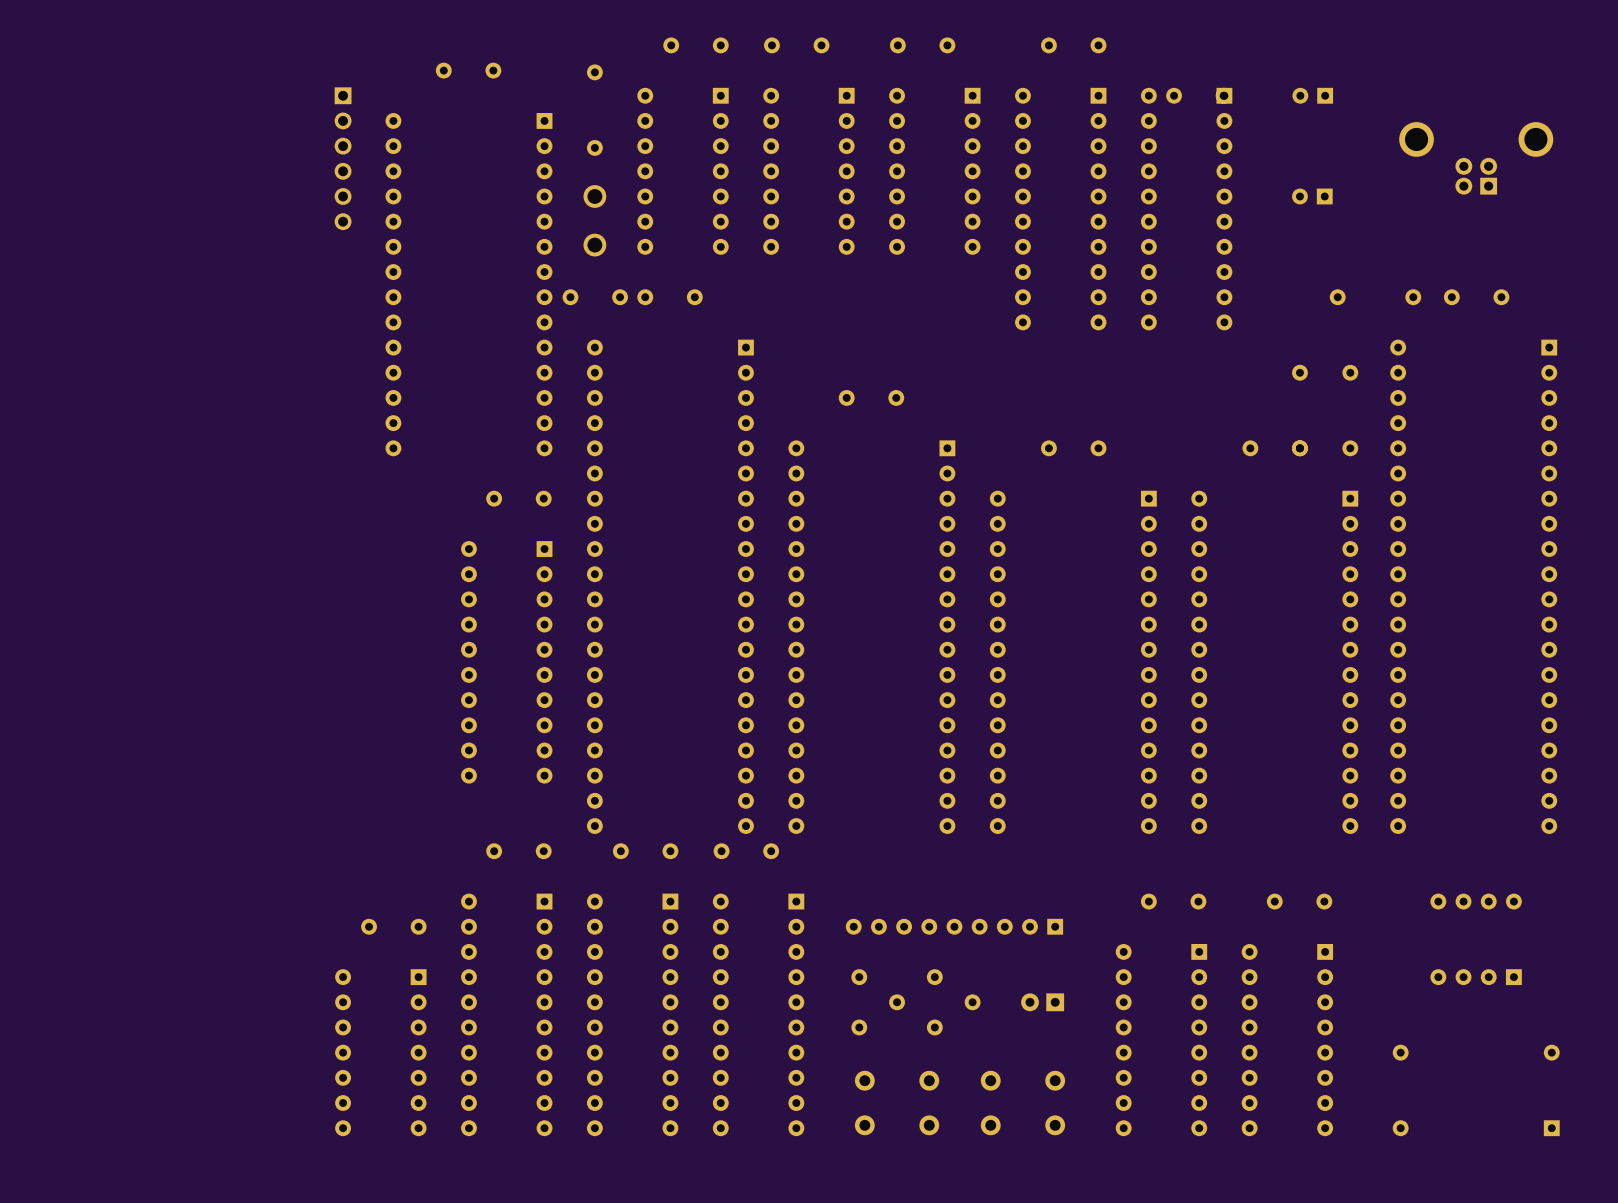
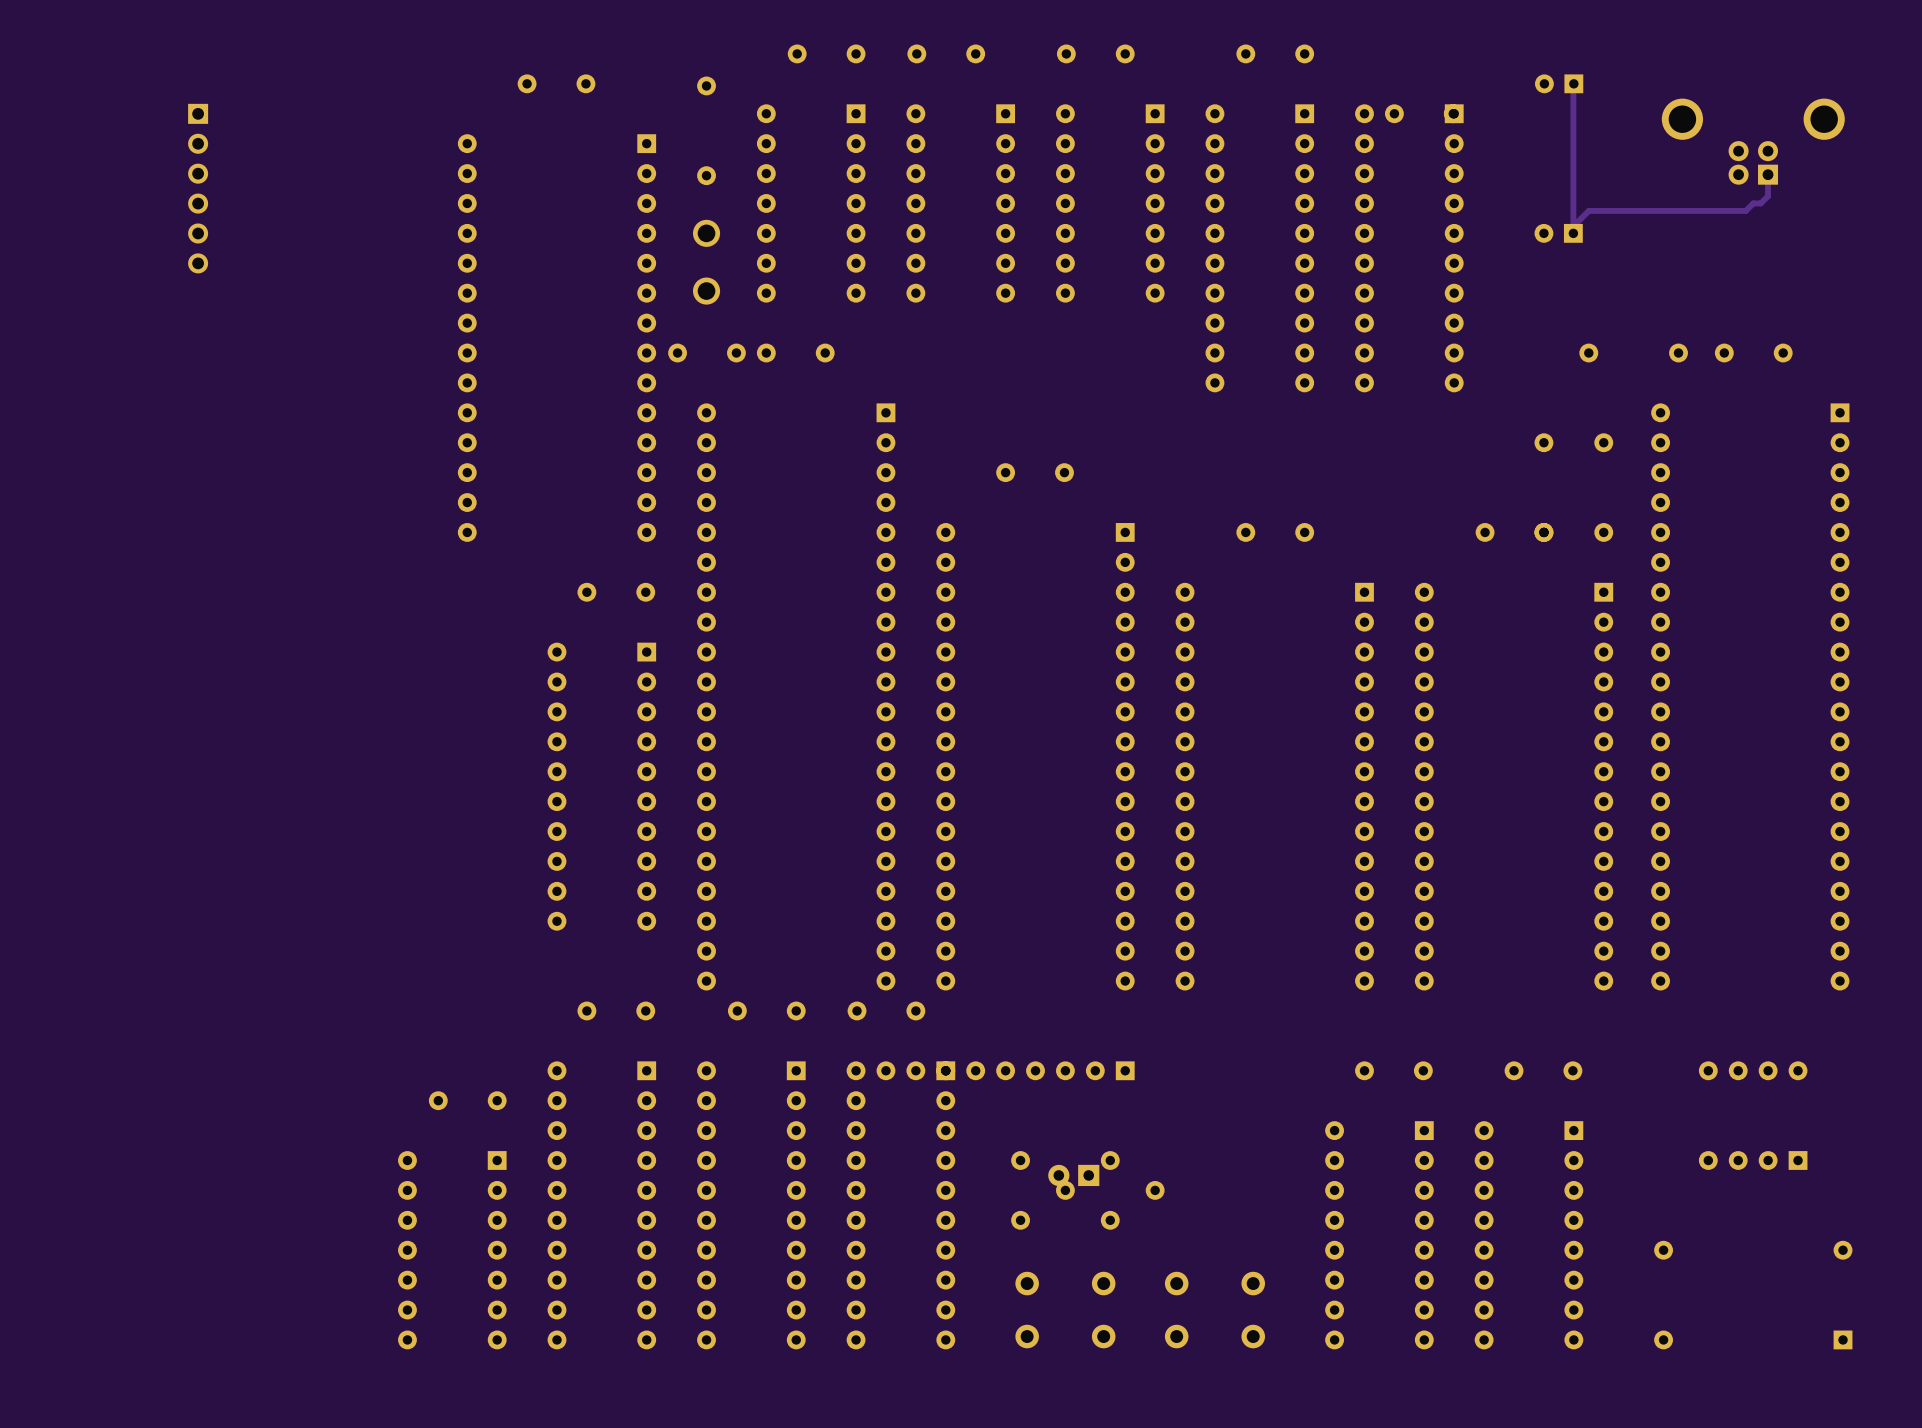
track: none -> (1573, 83) (1573, 233)
part position: (1312, 95) -> (1559, 83)
track: none -> (1768, 174) (1768, 196) (1760, 203) (1753, 203) (1745, 210) (1588, 210) (1573, 226)
part position: (343, 158) -> (198, 188)
part position: (1476, 158) -> (1753, 141)
part position: (954, 926) -> (1005, 1070)
part position: (1042, 1002) -> (1073, 1175)

